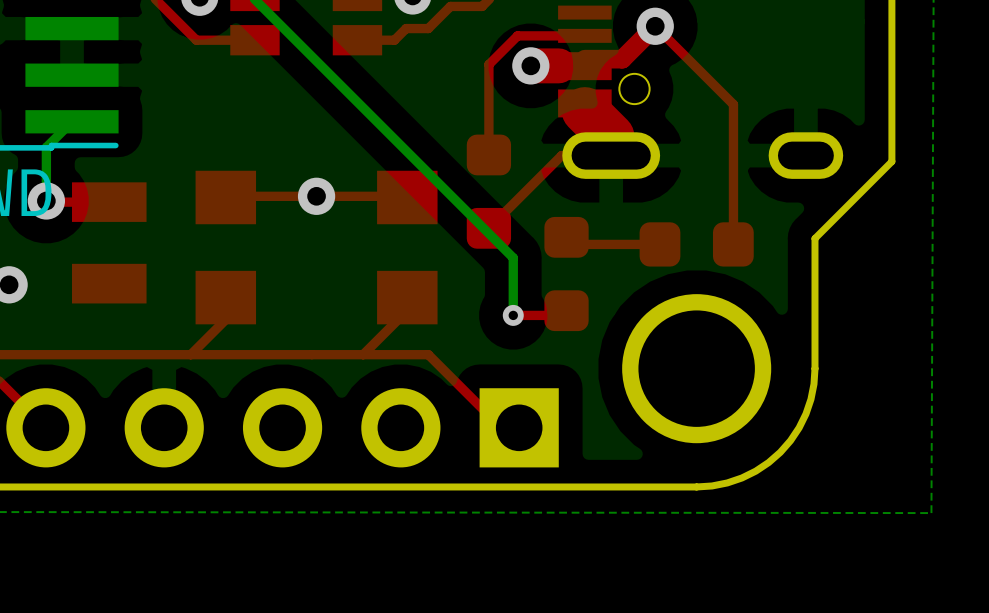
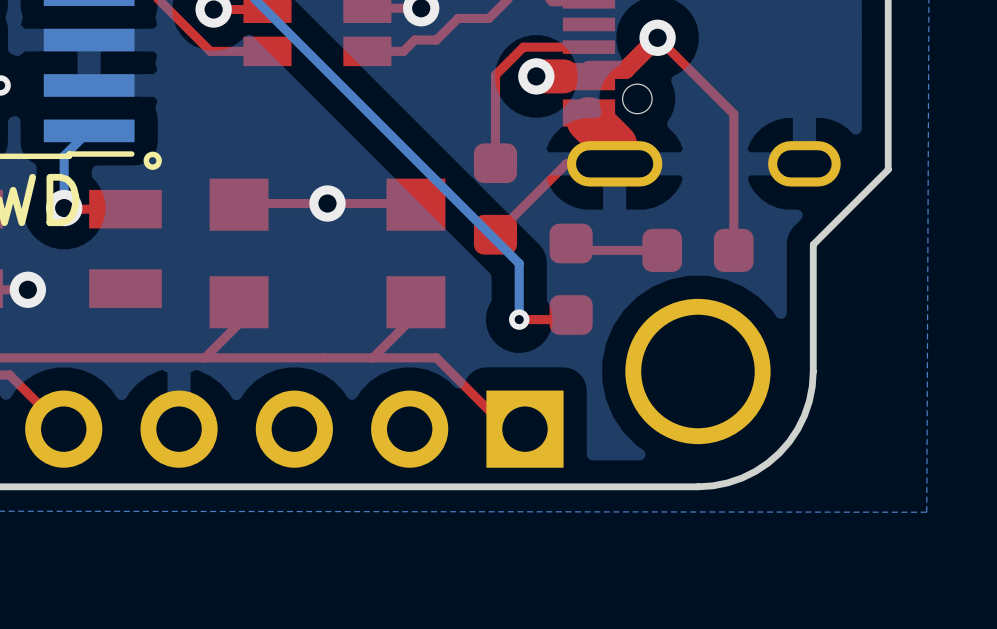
drawing: none -> [143, 151, 162, 170]

